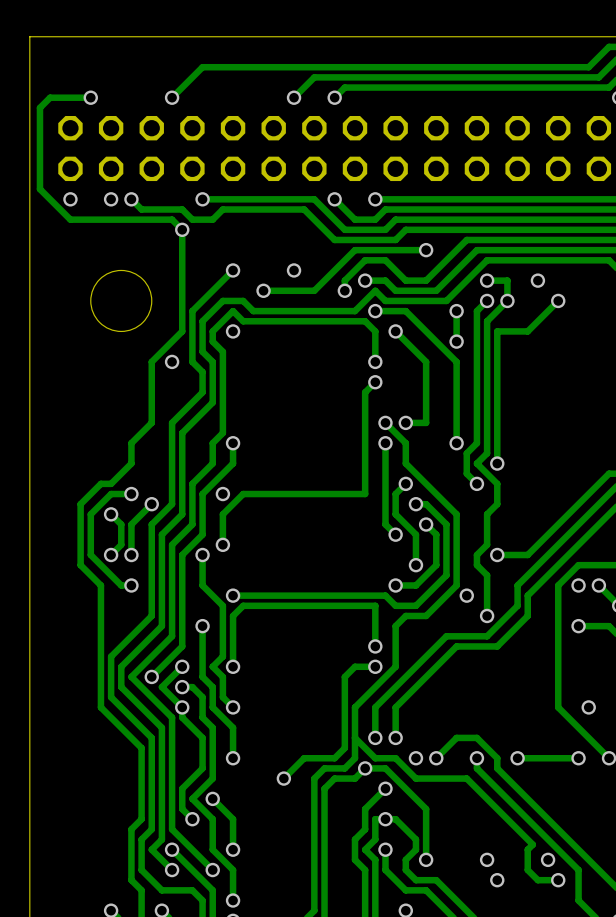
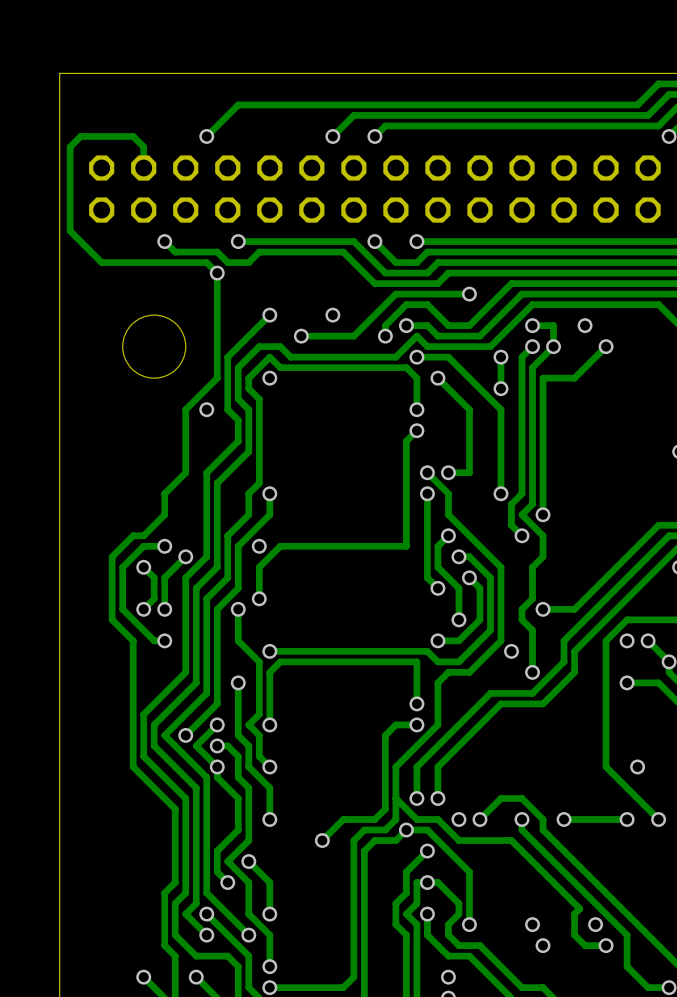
track: none -> (122, 136) (133, 136) (143, 146) (143, 168)
via: (90, 97) -> none
via: (70, 199) -> none
via: (111, 199) -> none

